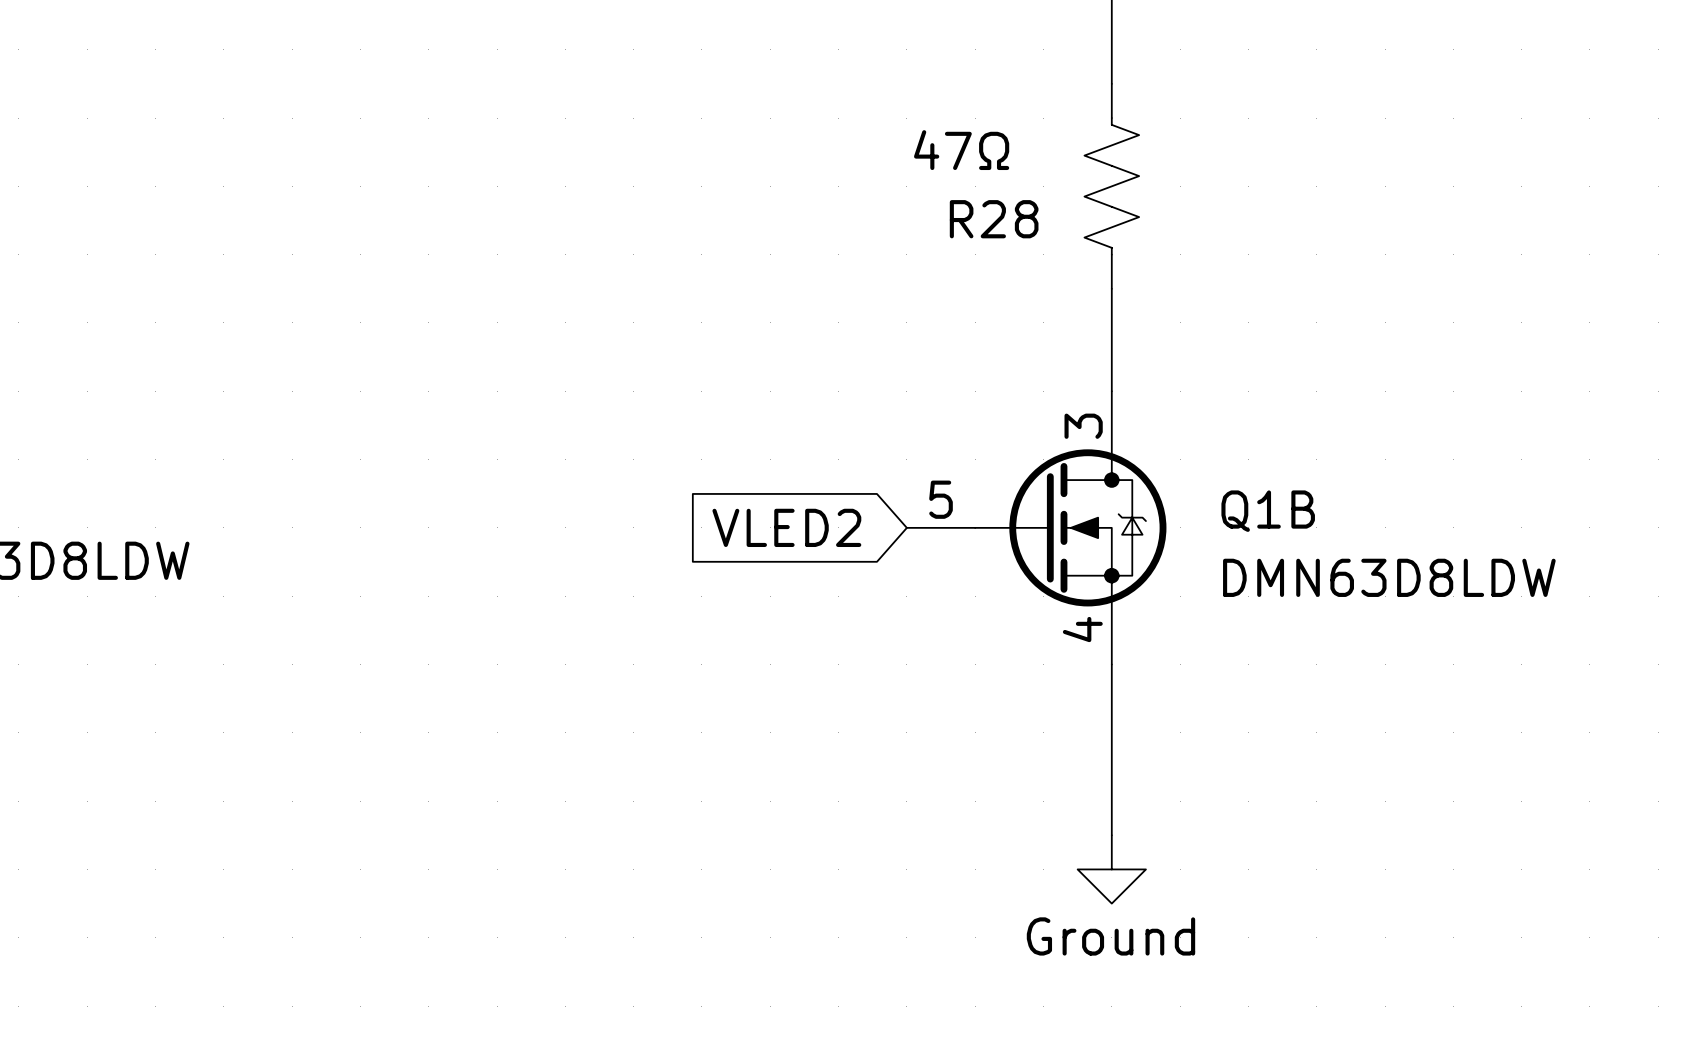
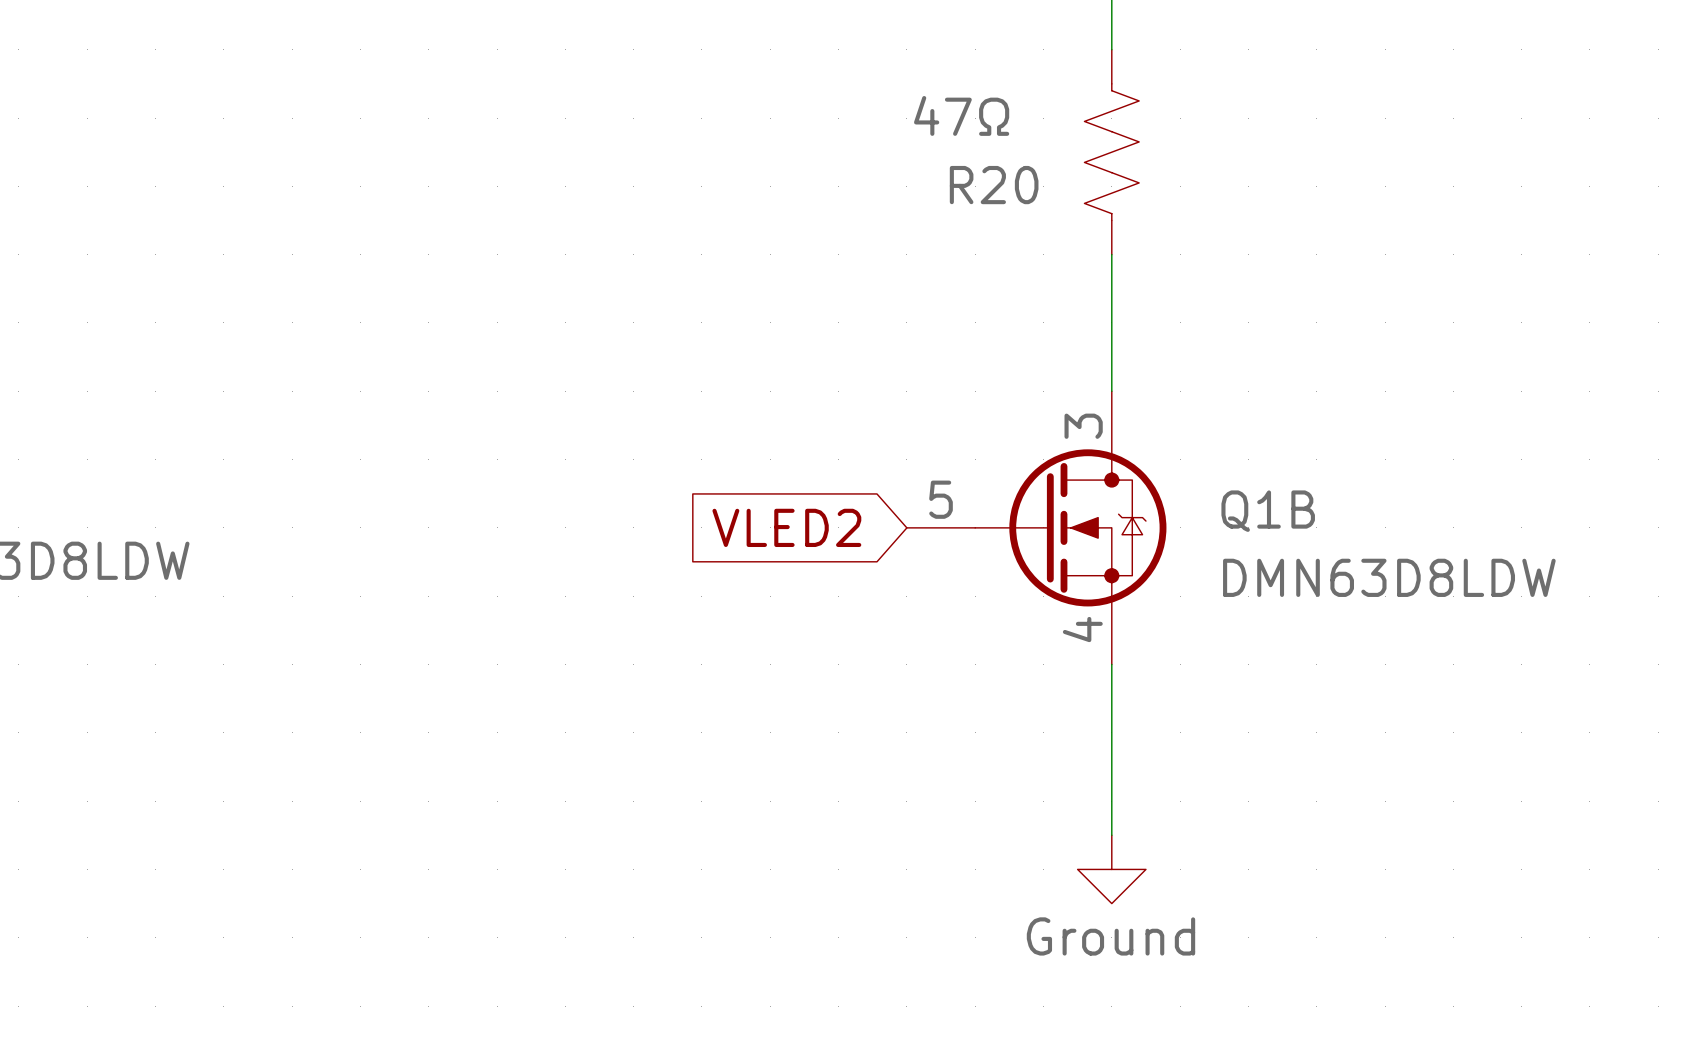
R20: none -> 47Ω (1111, 152)
R28: 47Ω (1111, 186) -> none

